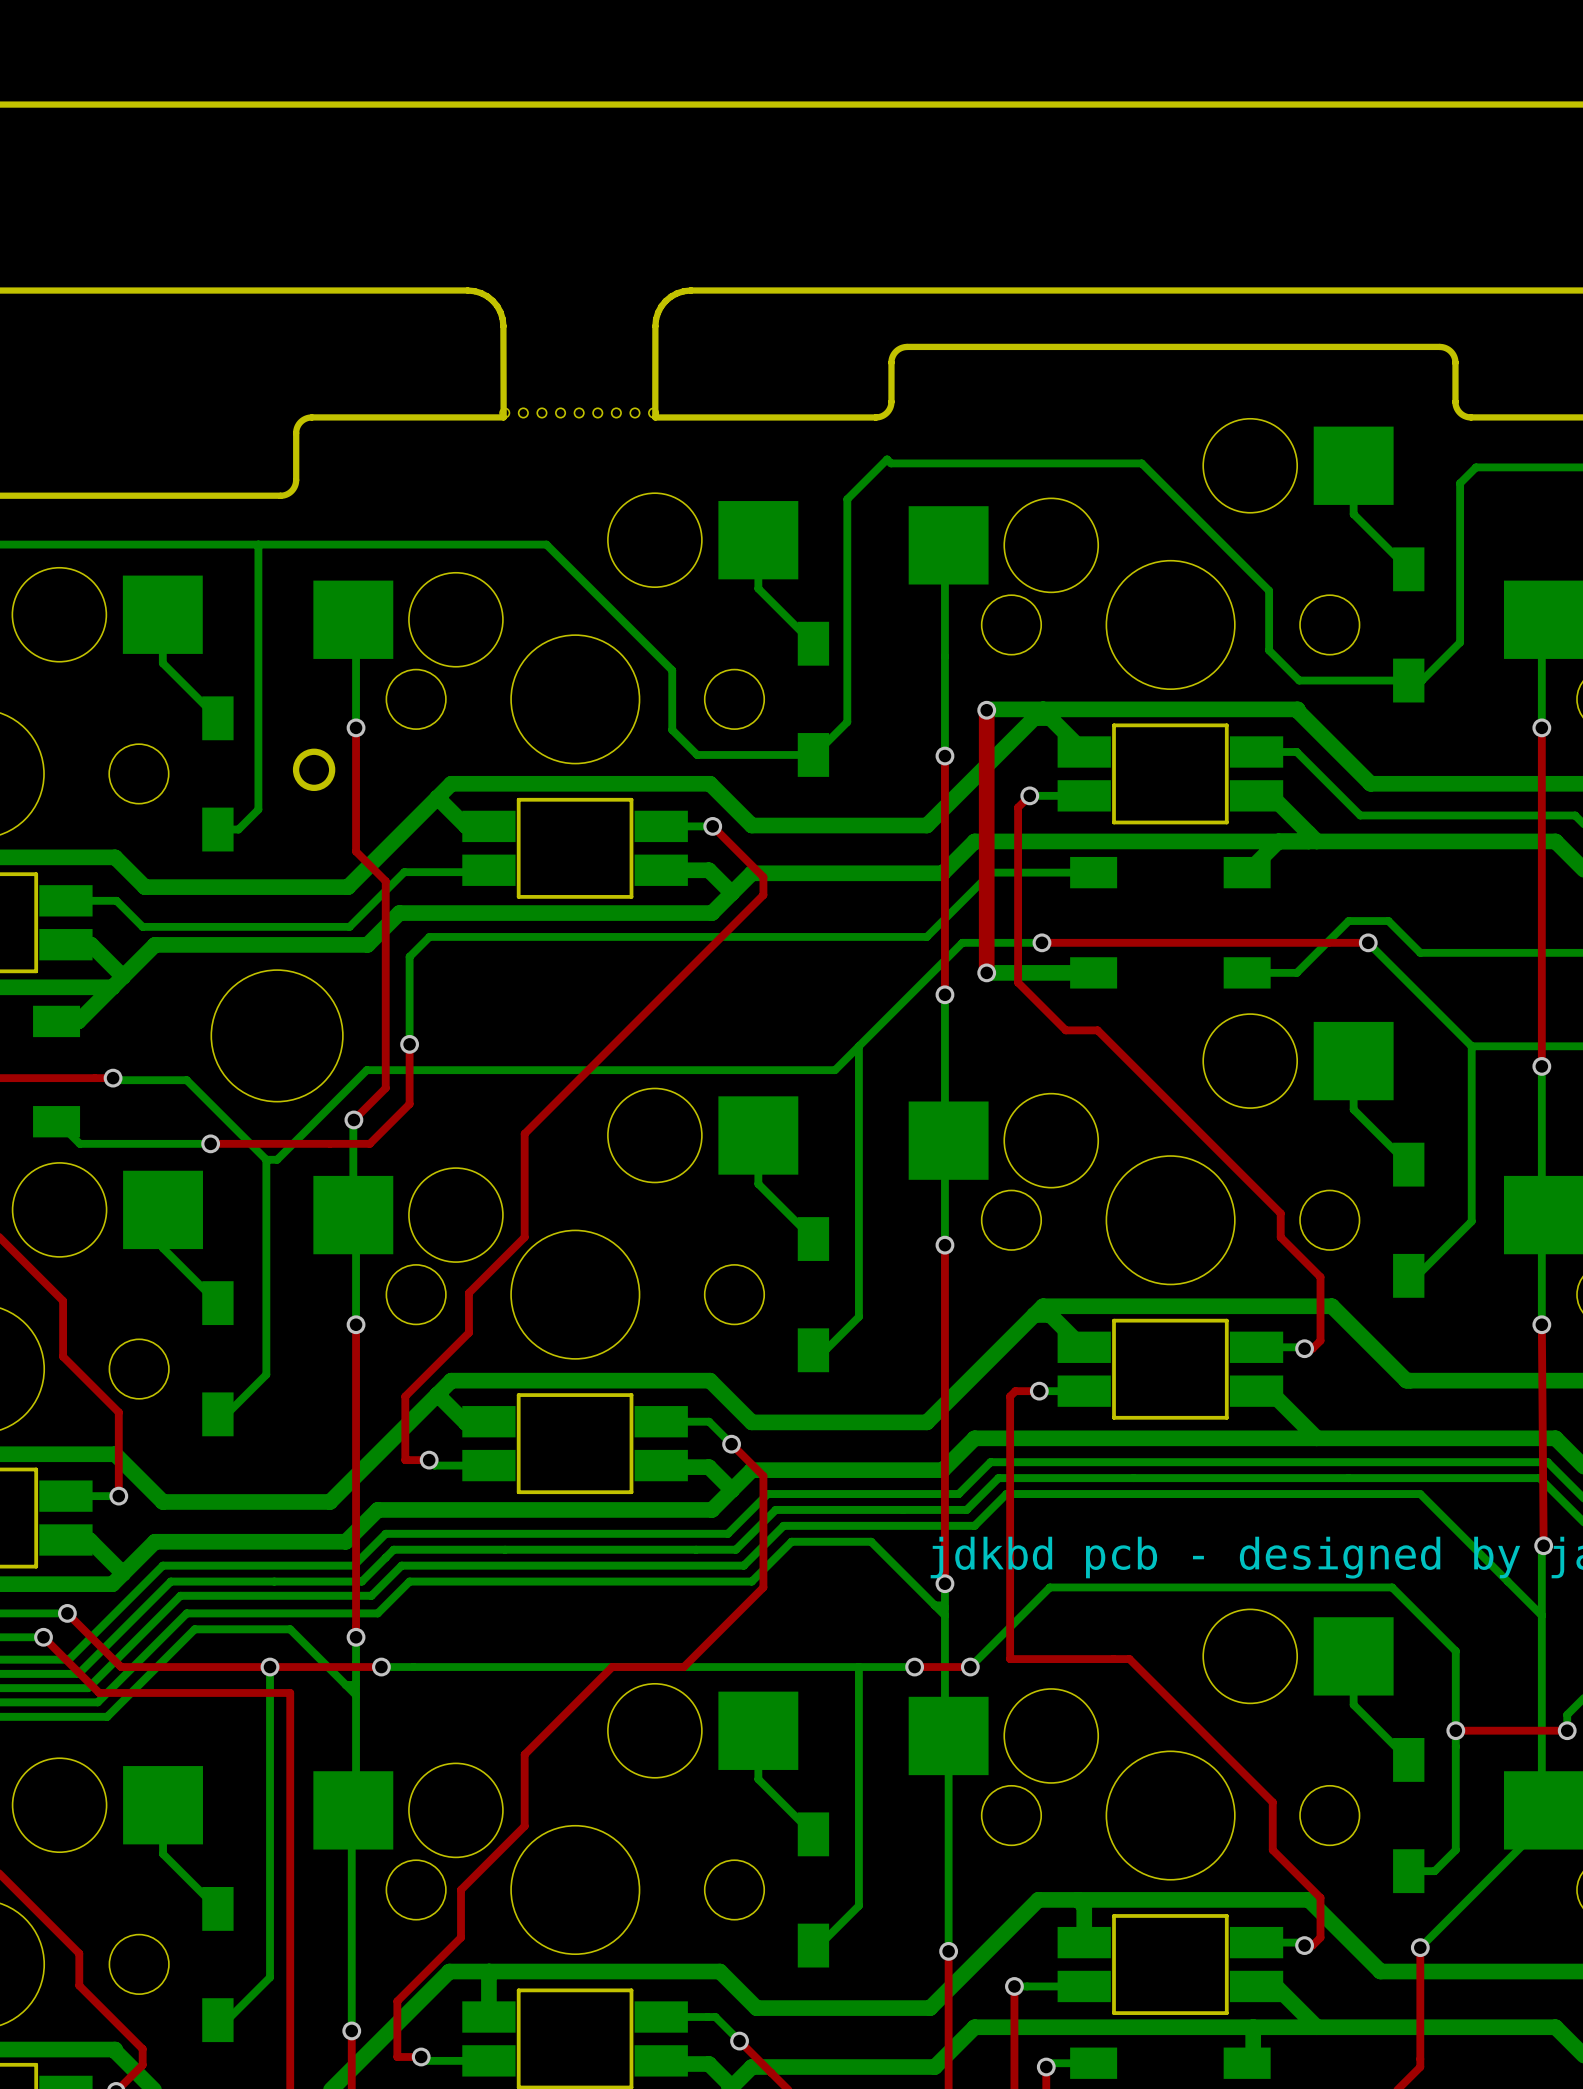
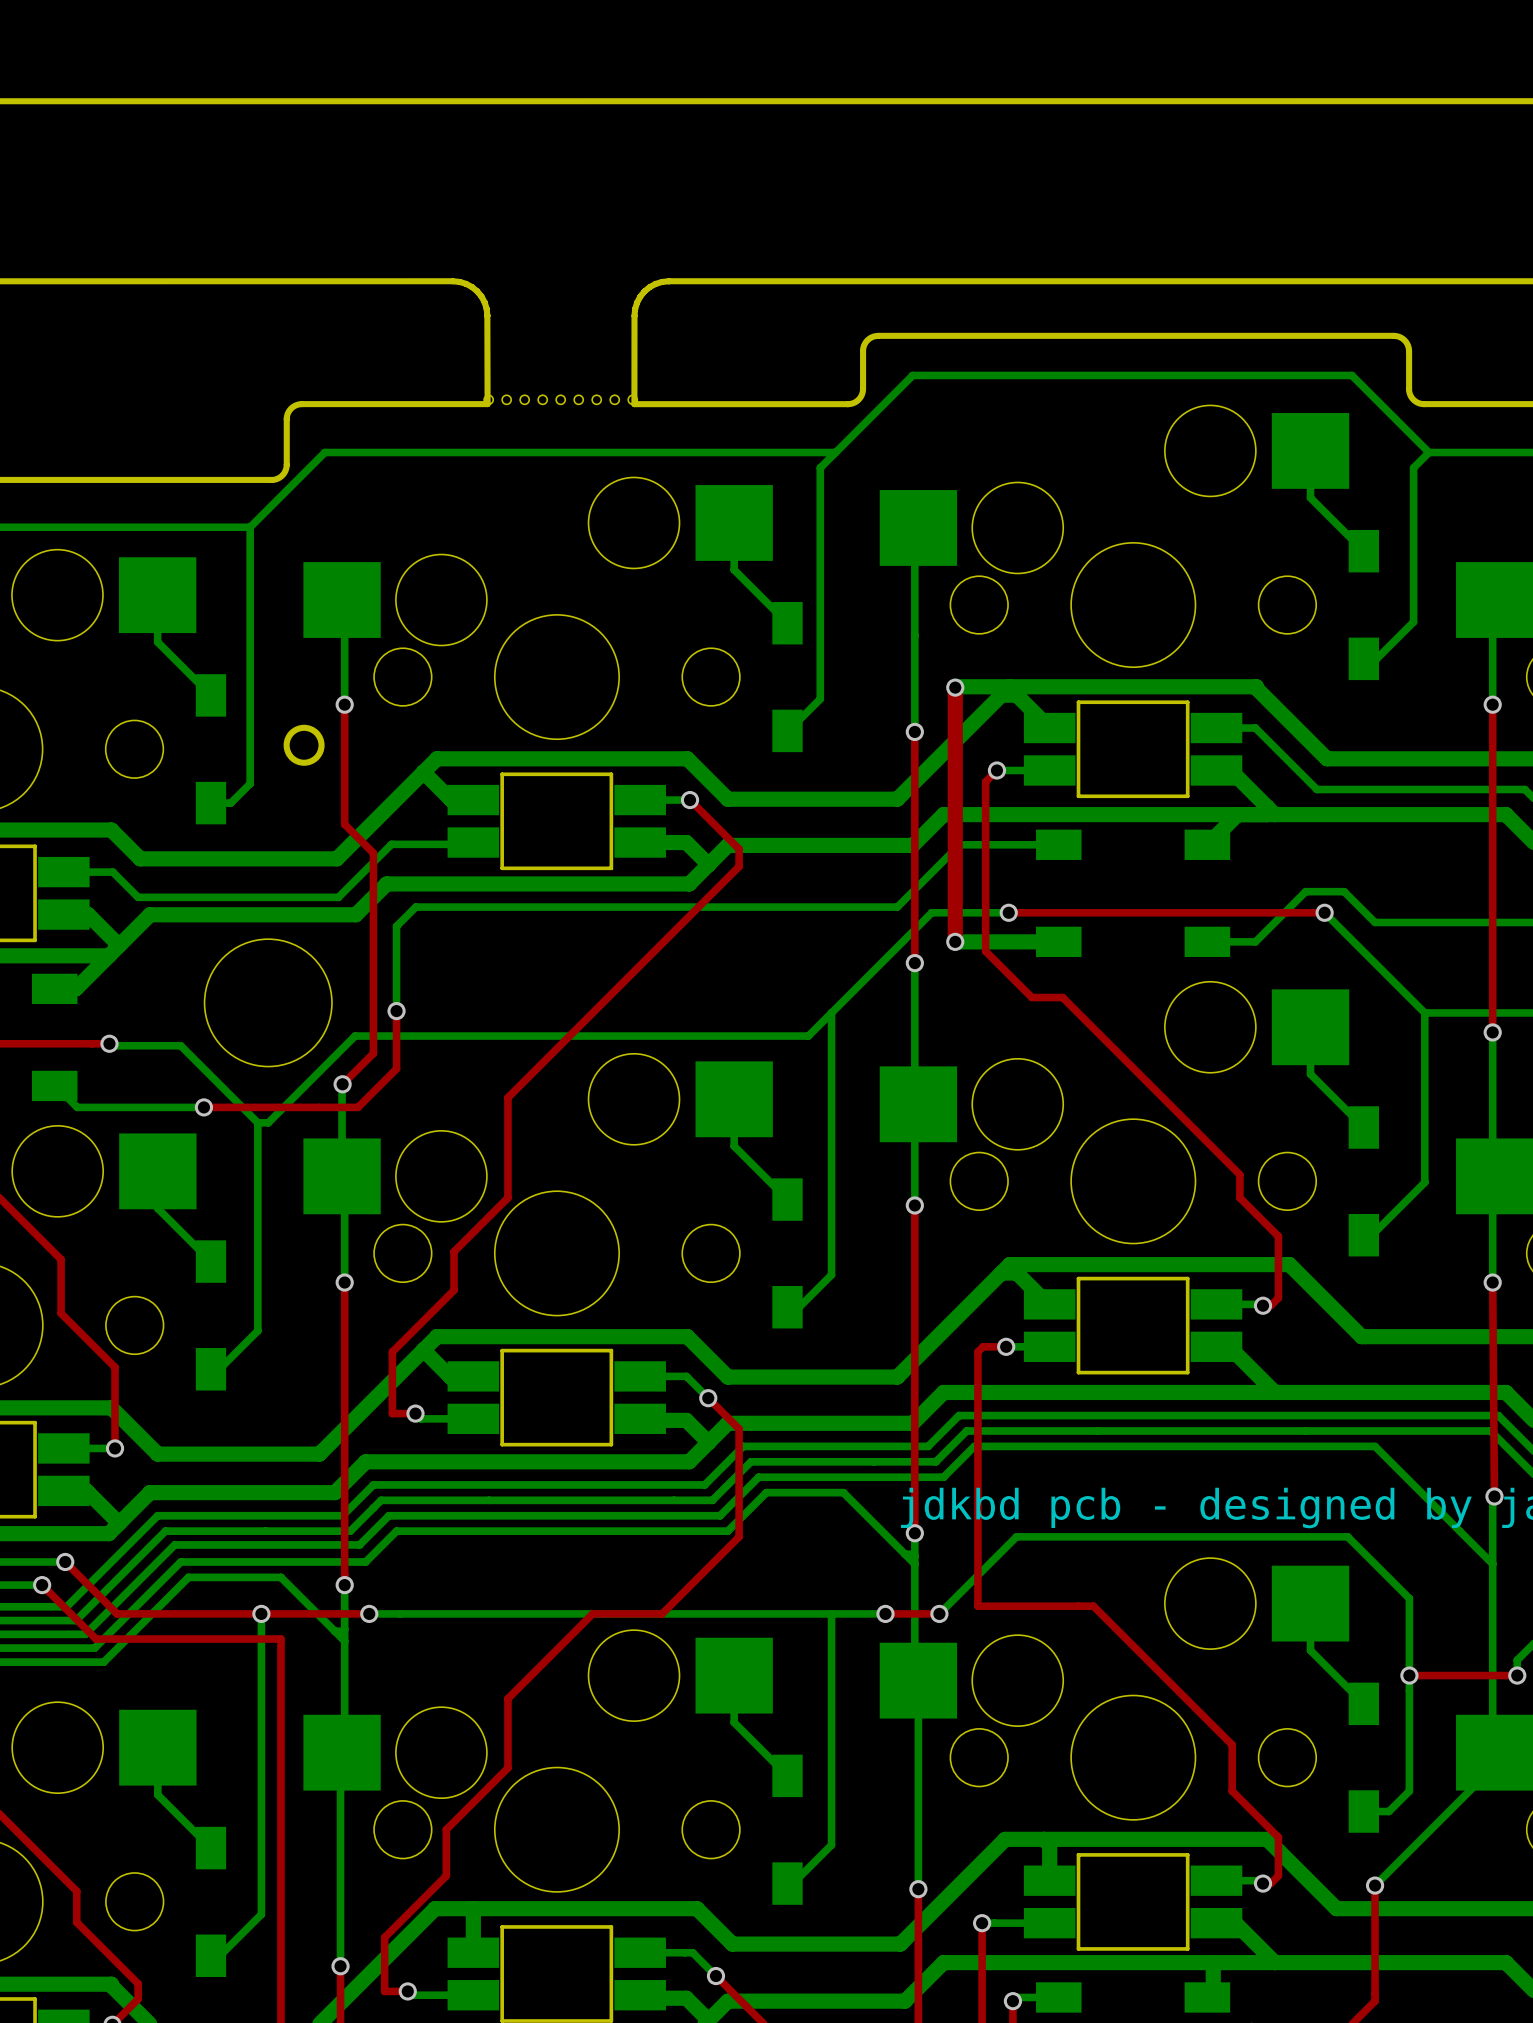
bottom track: (847, 499) (887, 459) (891, 463) (1141, 463) (1269, 590) (1269, 650) (1299, 680) (1408, 680) -> (820, 483) (820, 467) (912, 375) (1351, 375) (1428, 452)
bottom track: (258, 544) (546, 544) (672, 670) (672, 730) (697, 754) (813, 754) -> (250, 527) (324, 452) (835, 452)

